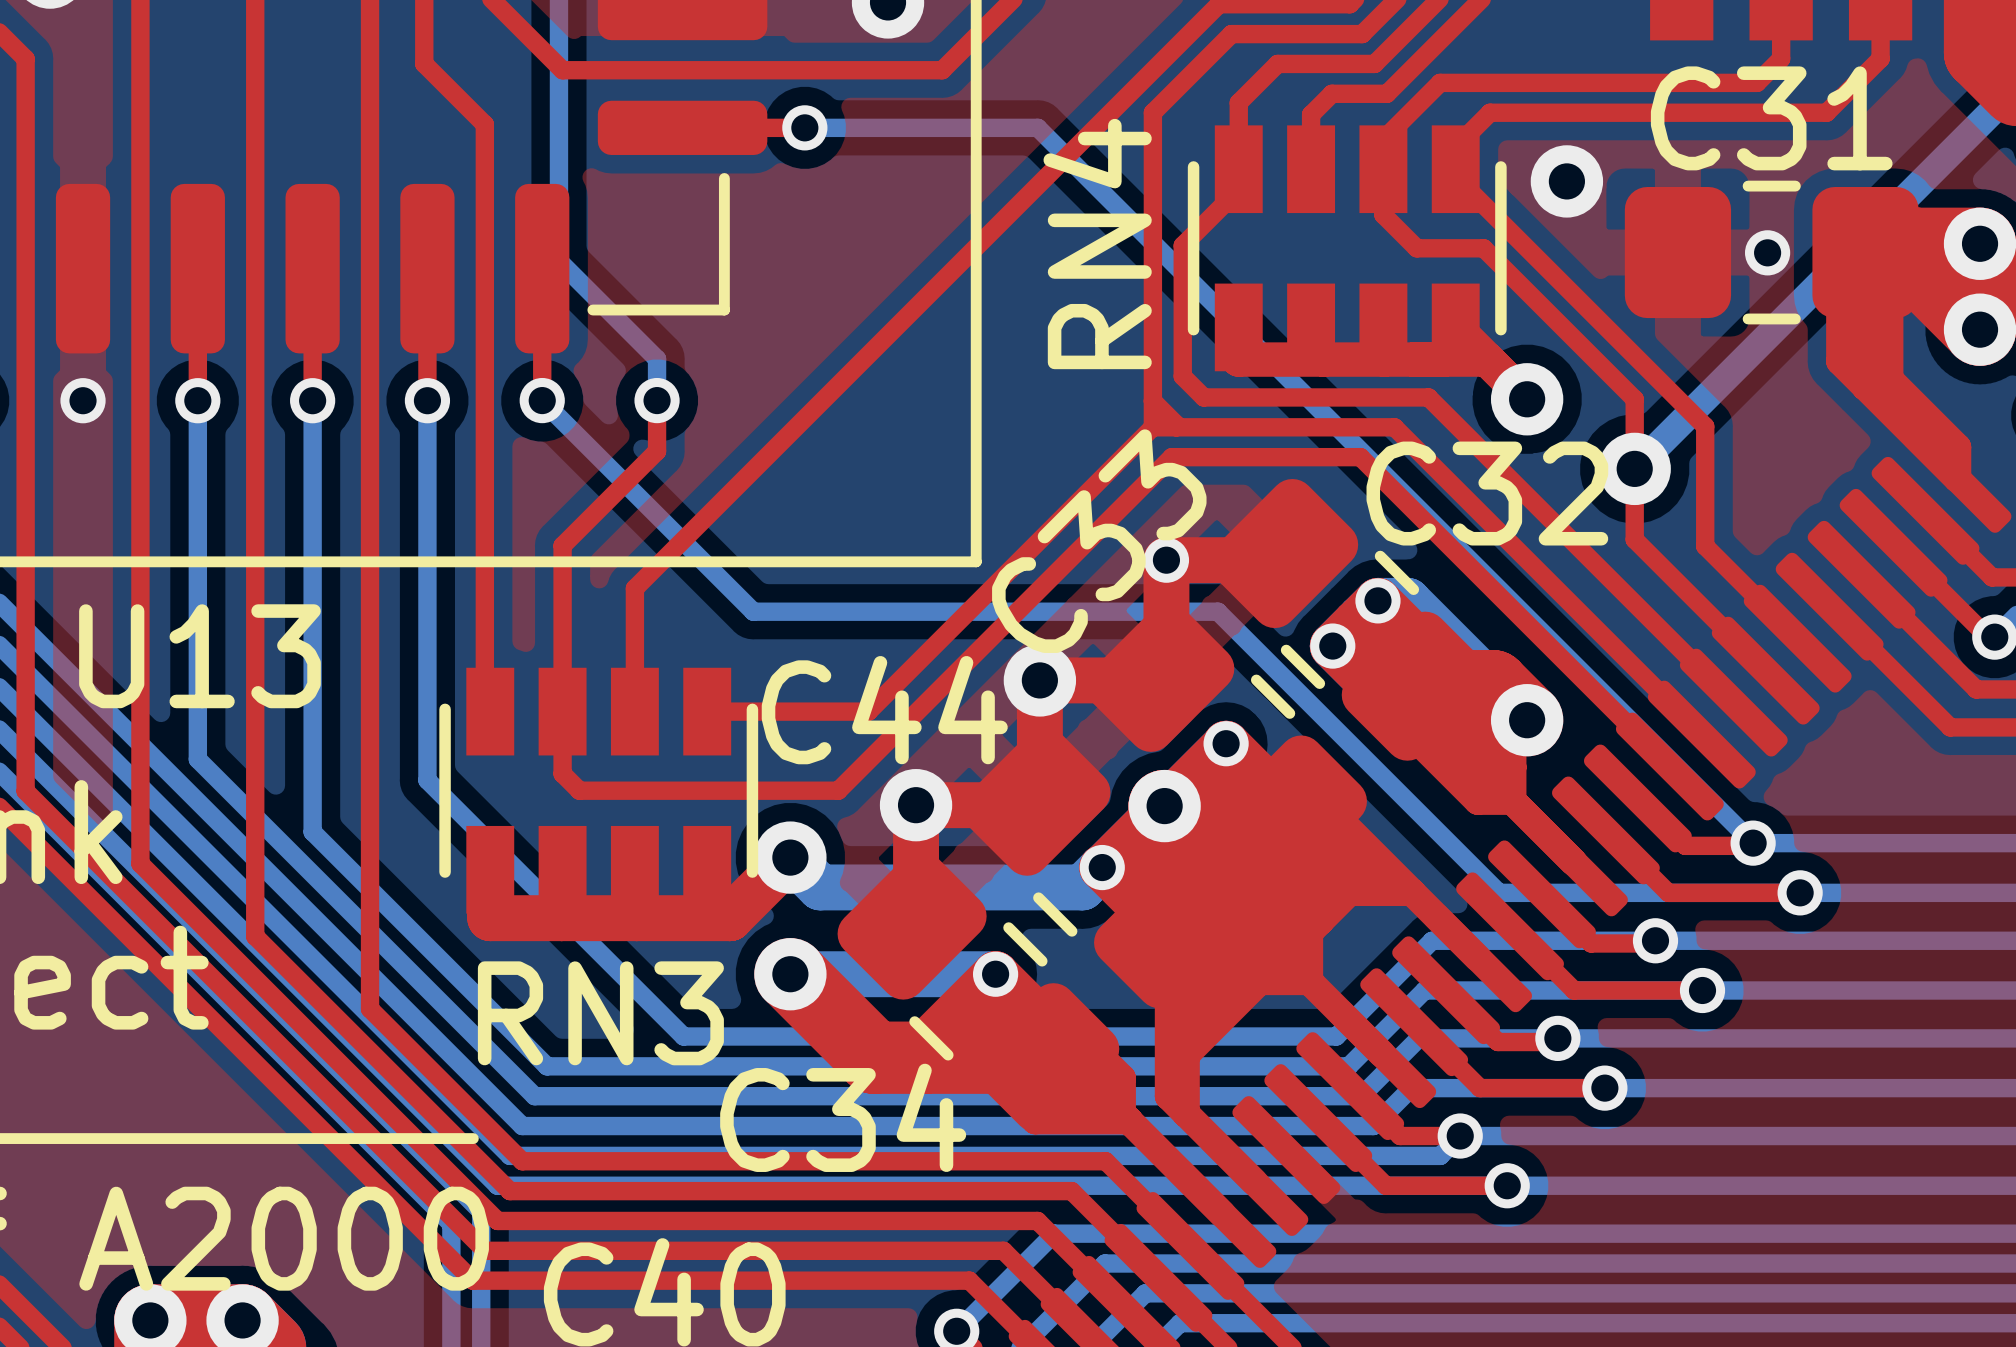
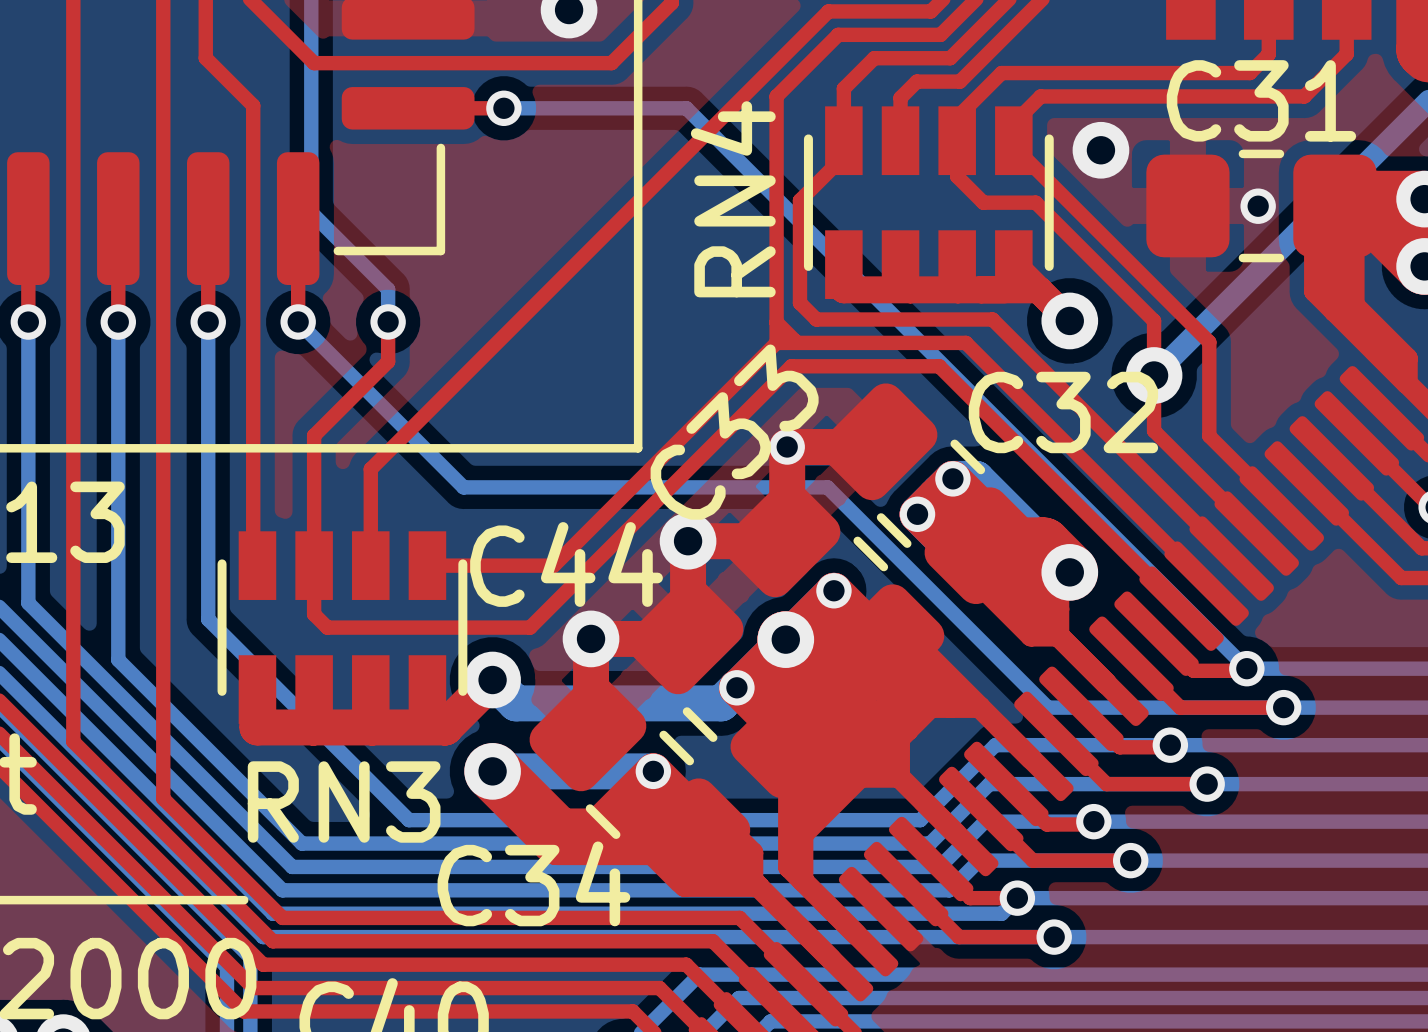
C32 name position: C32 (1487, 493) -> C32 (1063, 412)

